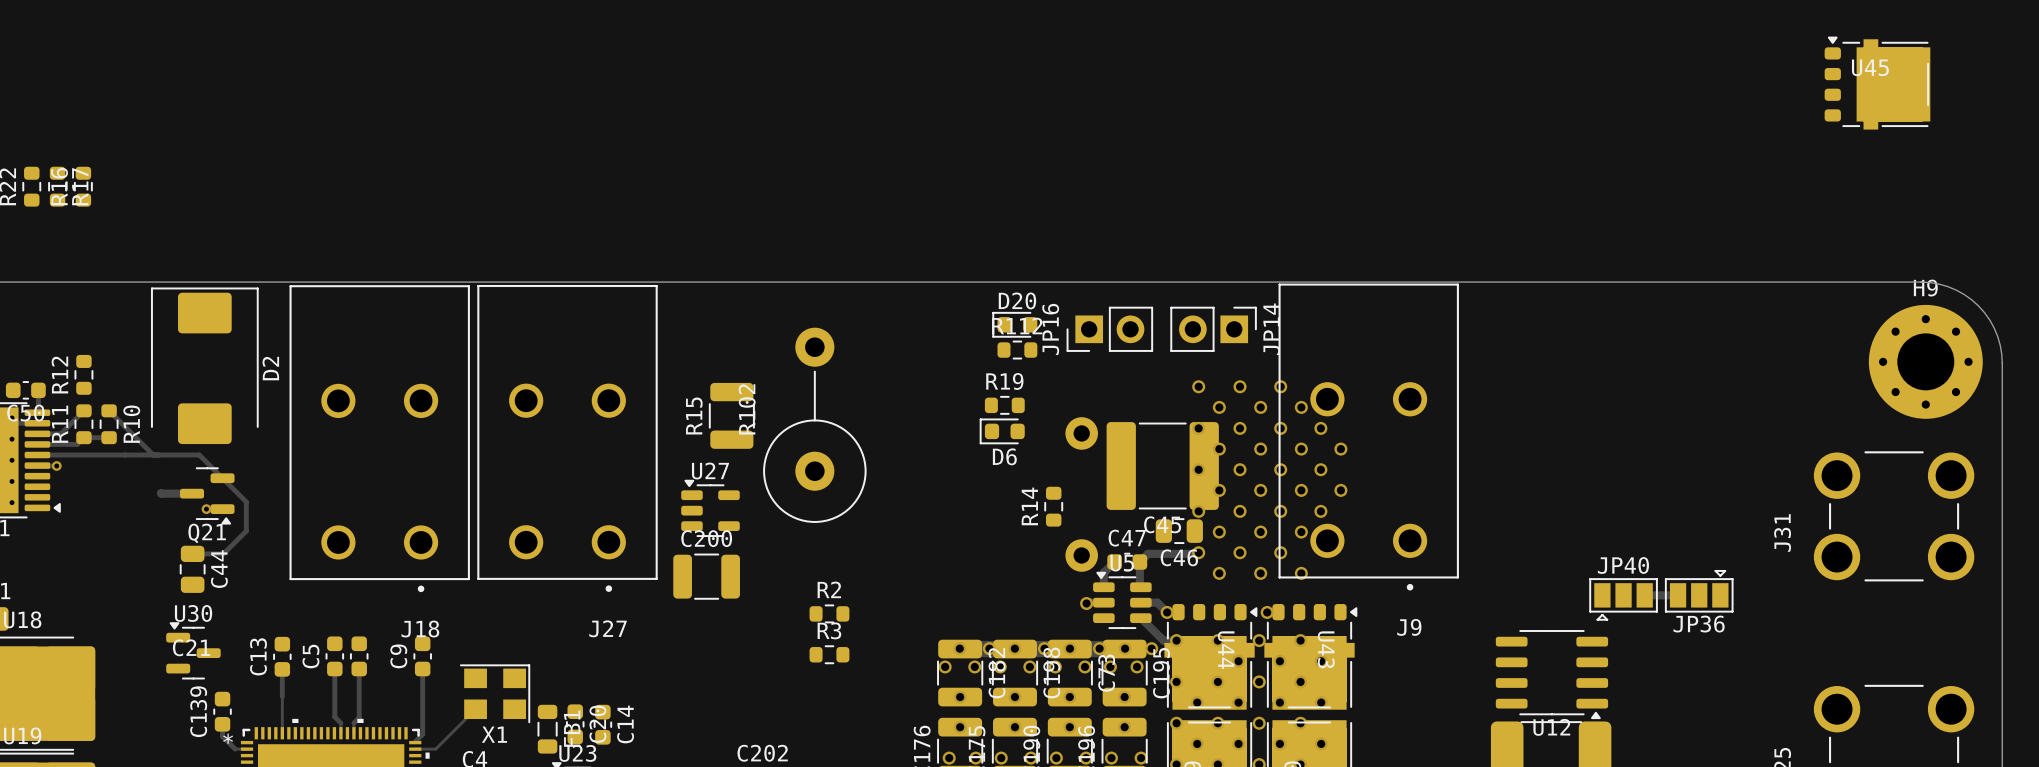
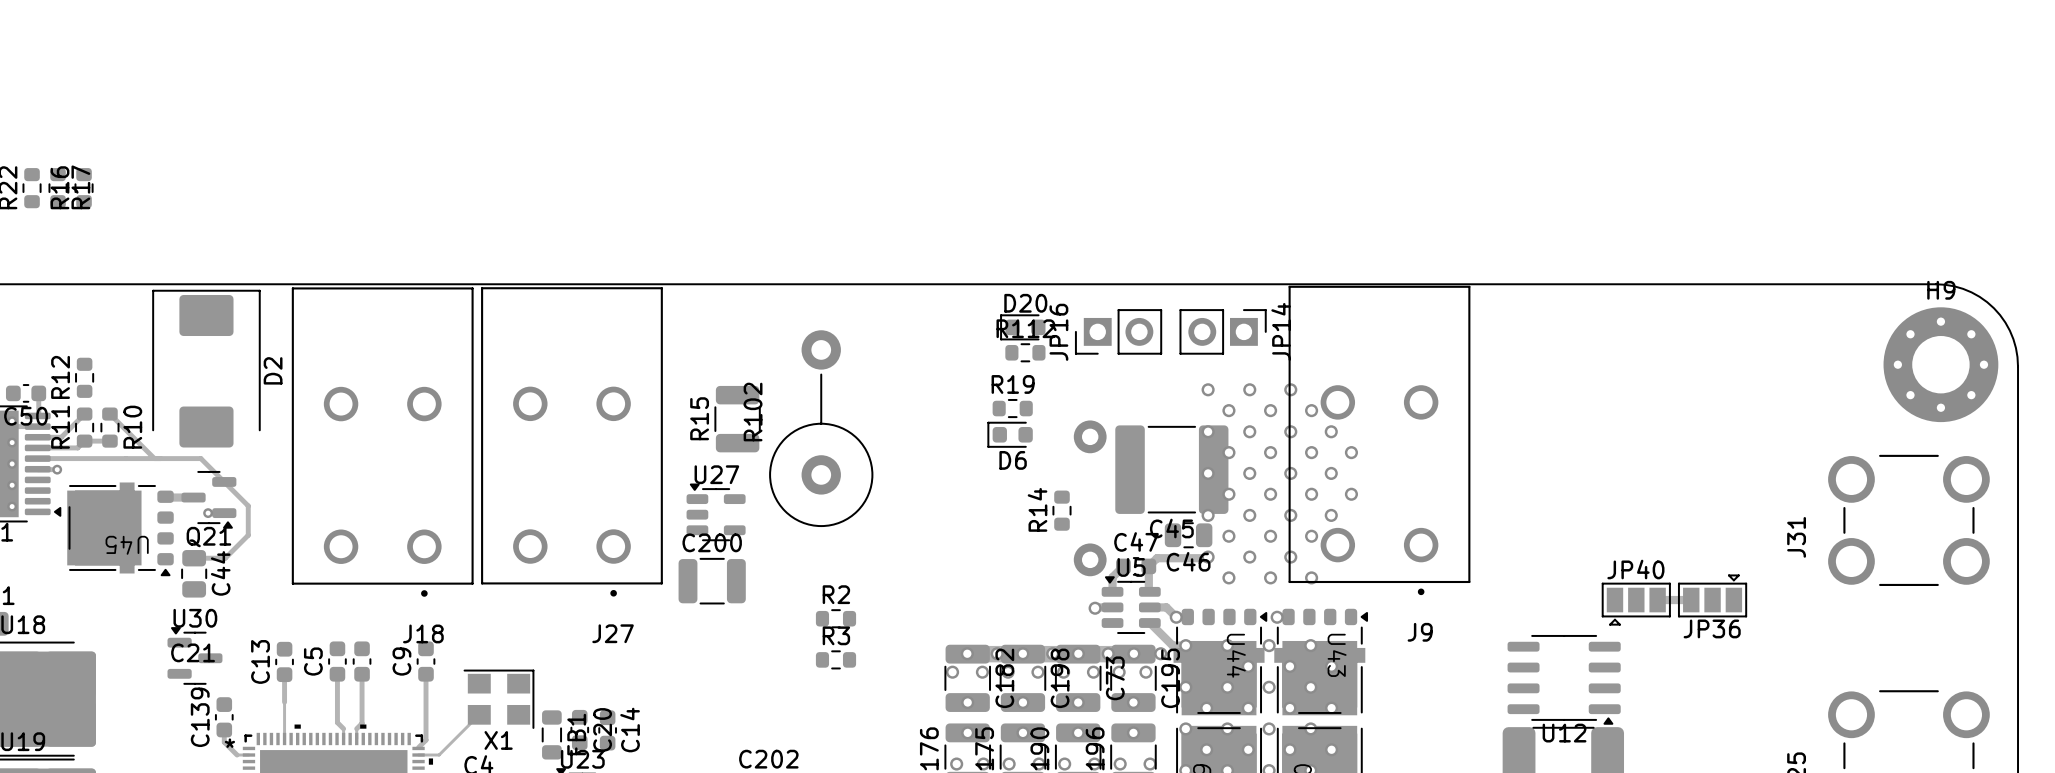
U45 rotation: 0° (1877, 83) -> 180° (120, 529)
U45 position: (1877, 83) -> (120, 529)

